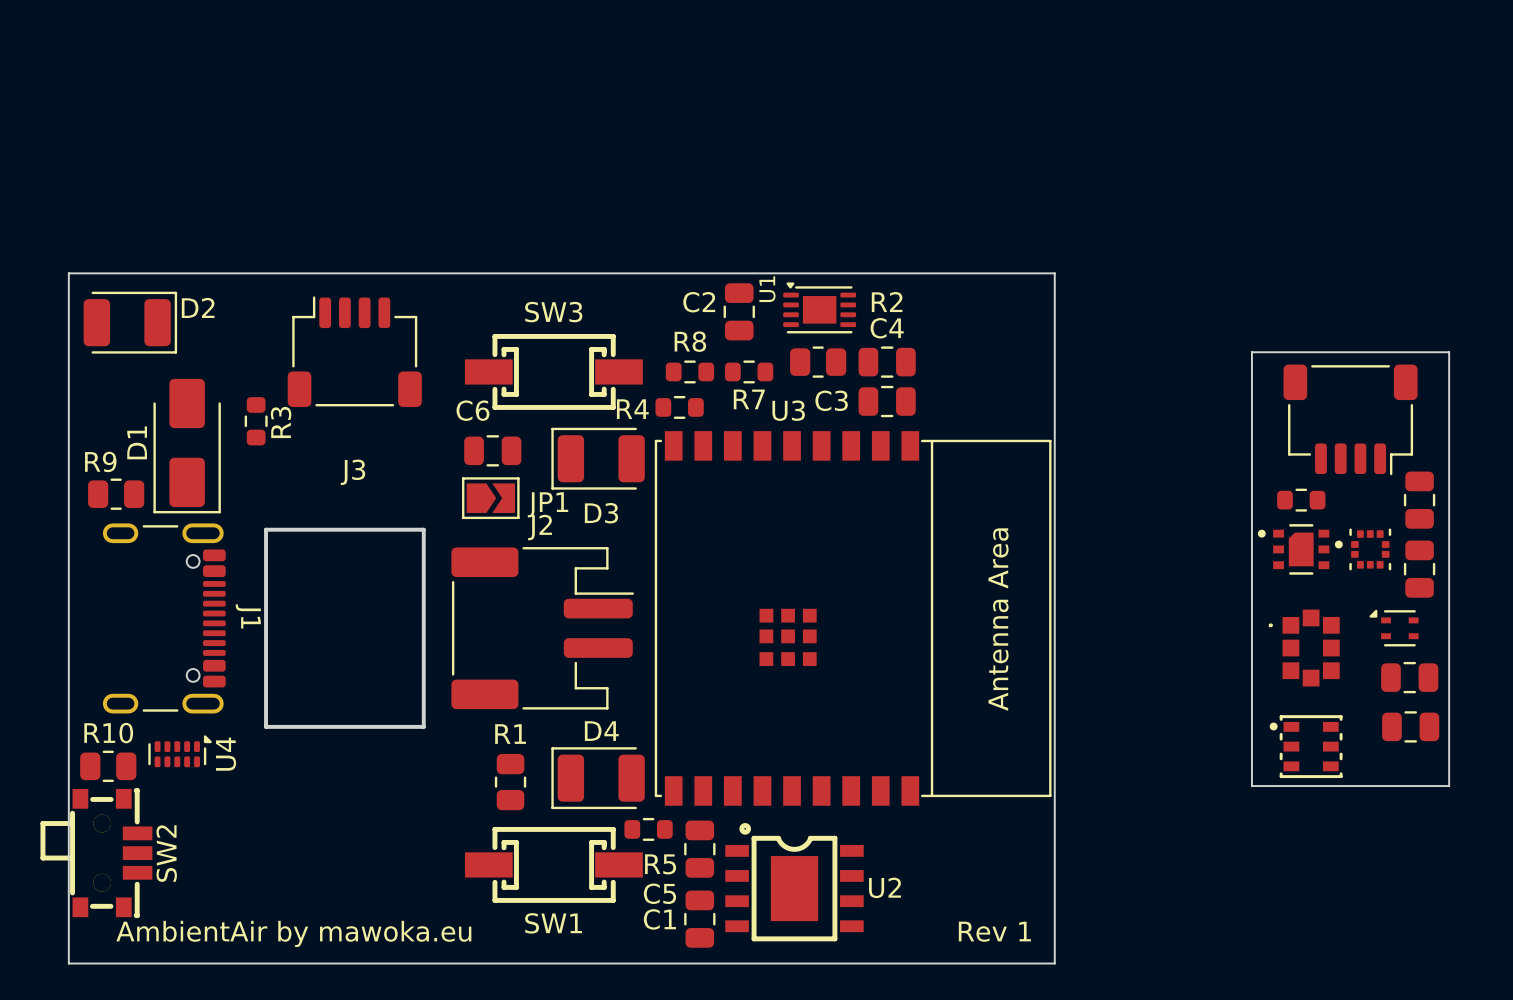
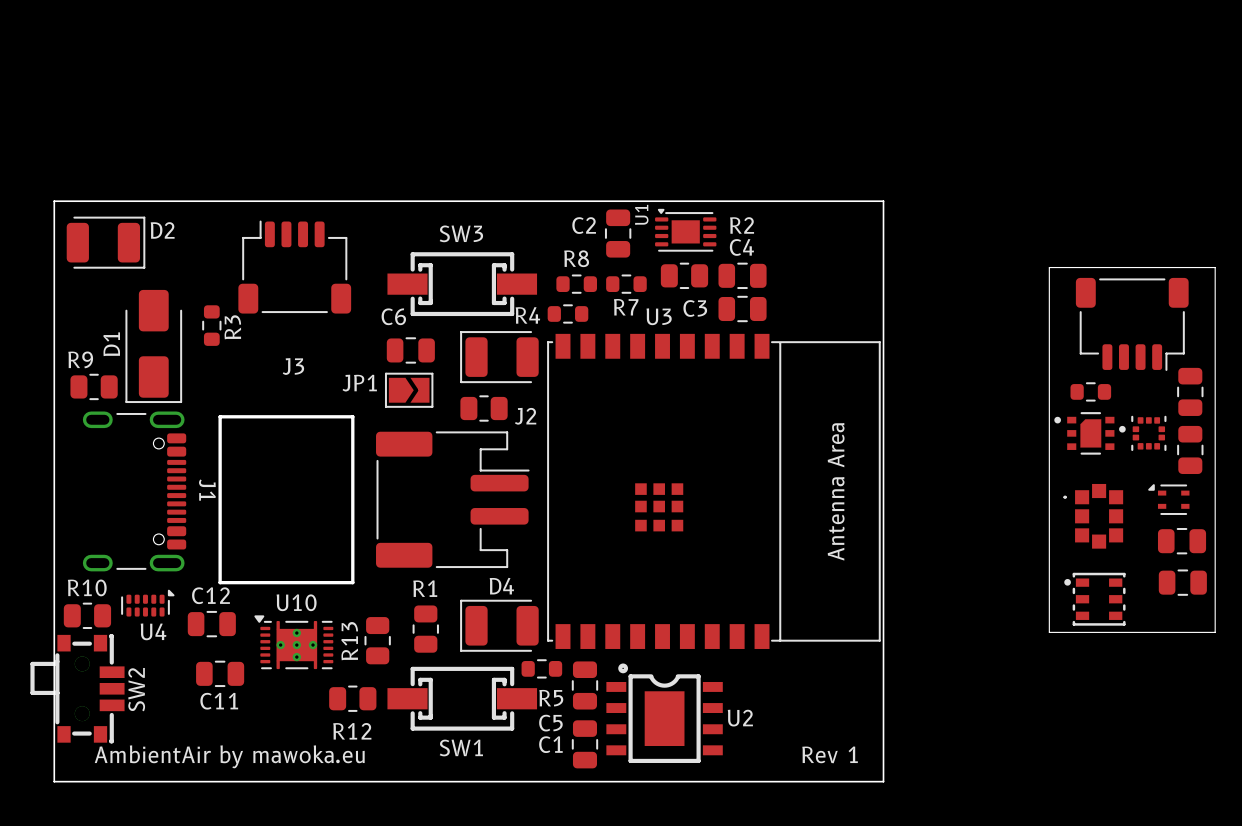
JP1 name position: JP1 (548, 504) -> JP1 (359, 383)
D3 name: D3 (601, 513) -> none
part: none -> (484, 408)
J2 name position: J2 (540, 527) -> J2 (525, 416)
U4 name rotation: 0° (226, 754) -> 90° clockwise (153, 631)
U4 name position: U4 (226, 754) -> U4 (153, 631)
C12: none -> (211, 624)
R13: none -> (377, 640)
U10: none -> (293, 642)
C11: none -> (220, 673)
R12: none -> (352, 698)

